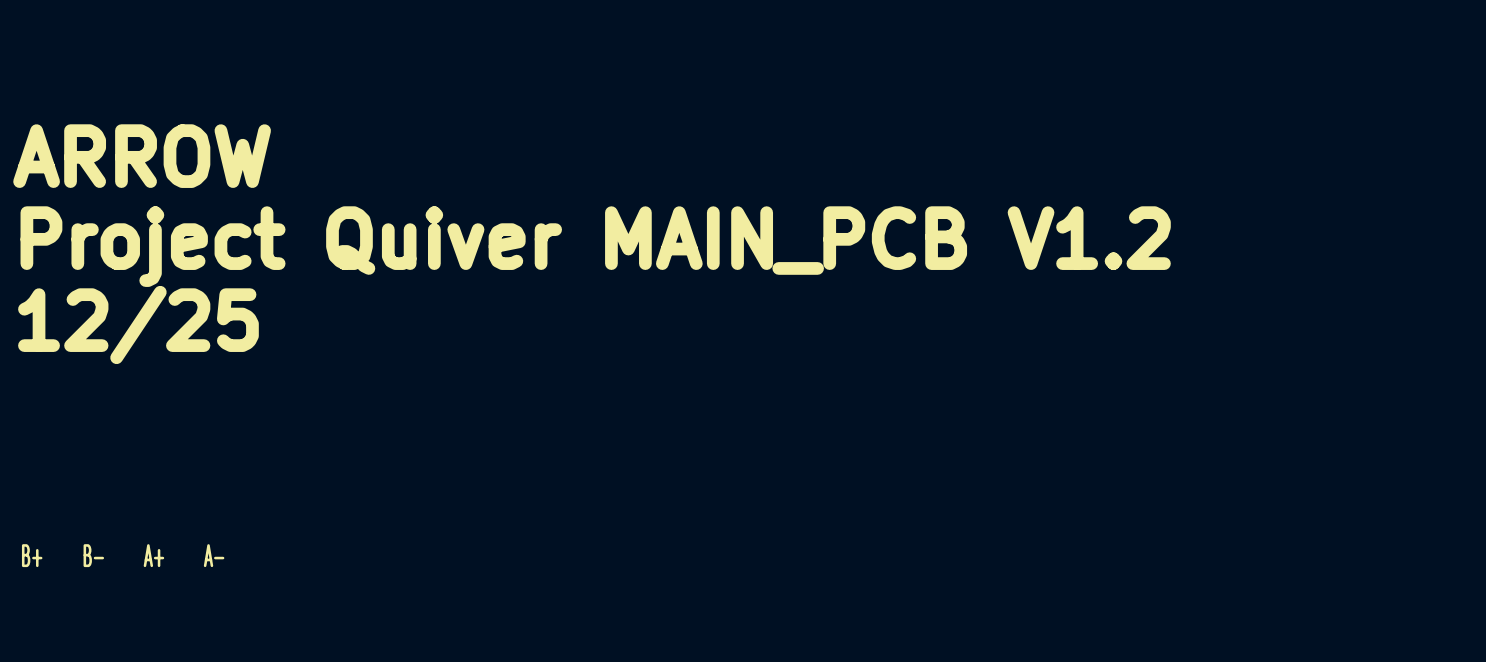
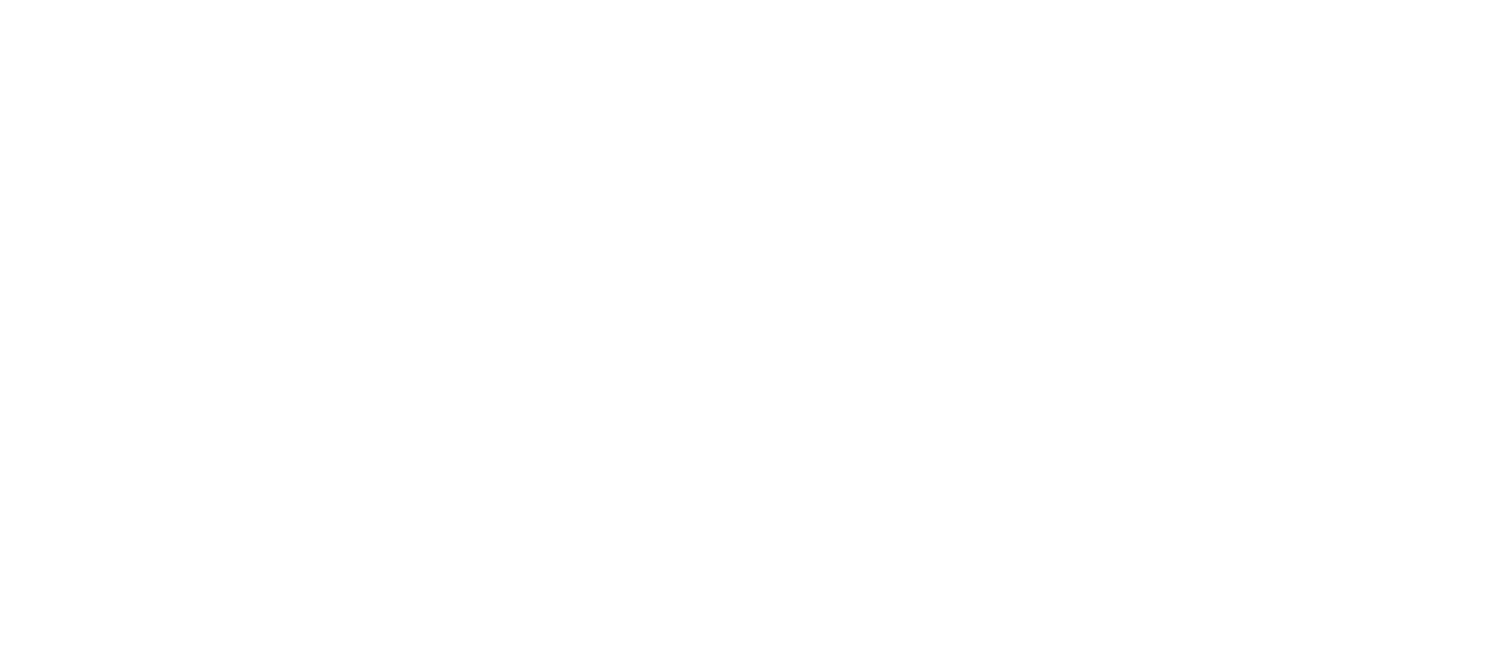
text: ARROW (142, 156) -> none
text: Project Quiver MAIN_PCB V1.2 (595, 246) -> none
text: 12/25 (138, 324) -> none
text: B+ B- A+ A- (123, 555) -> none

